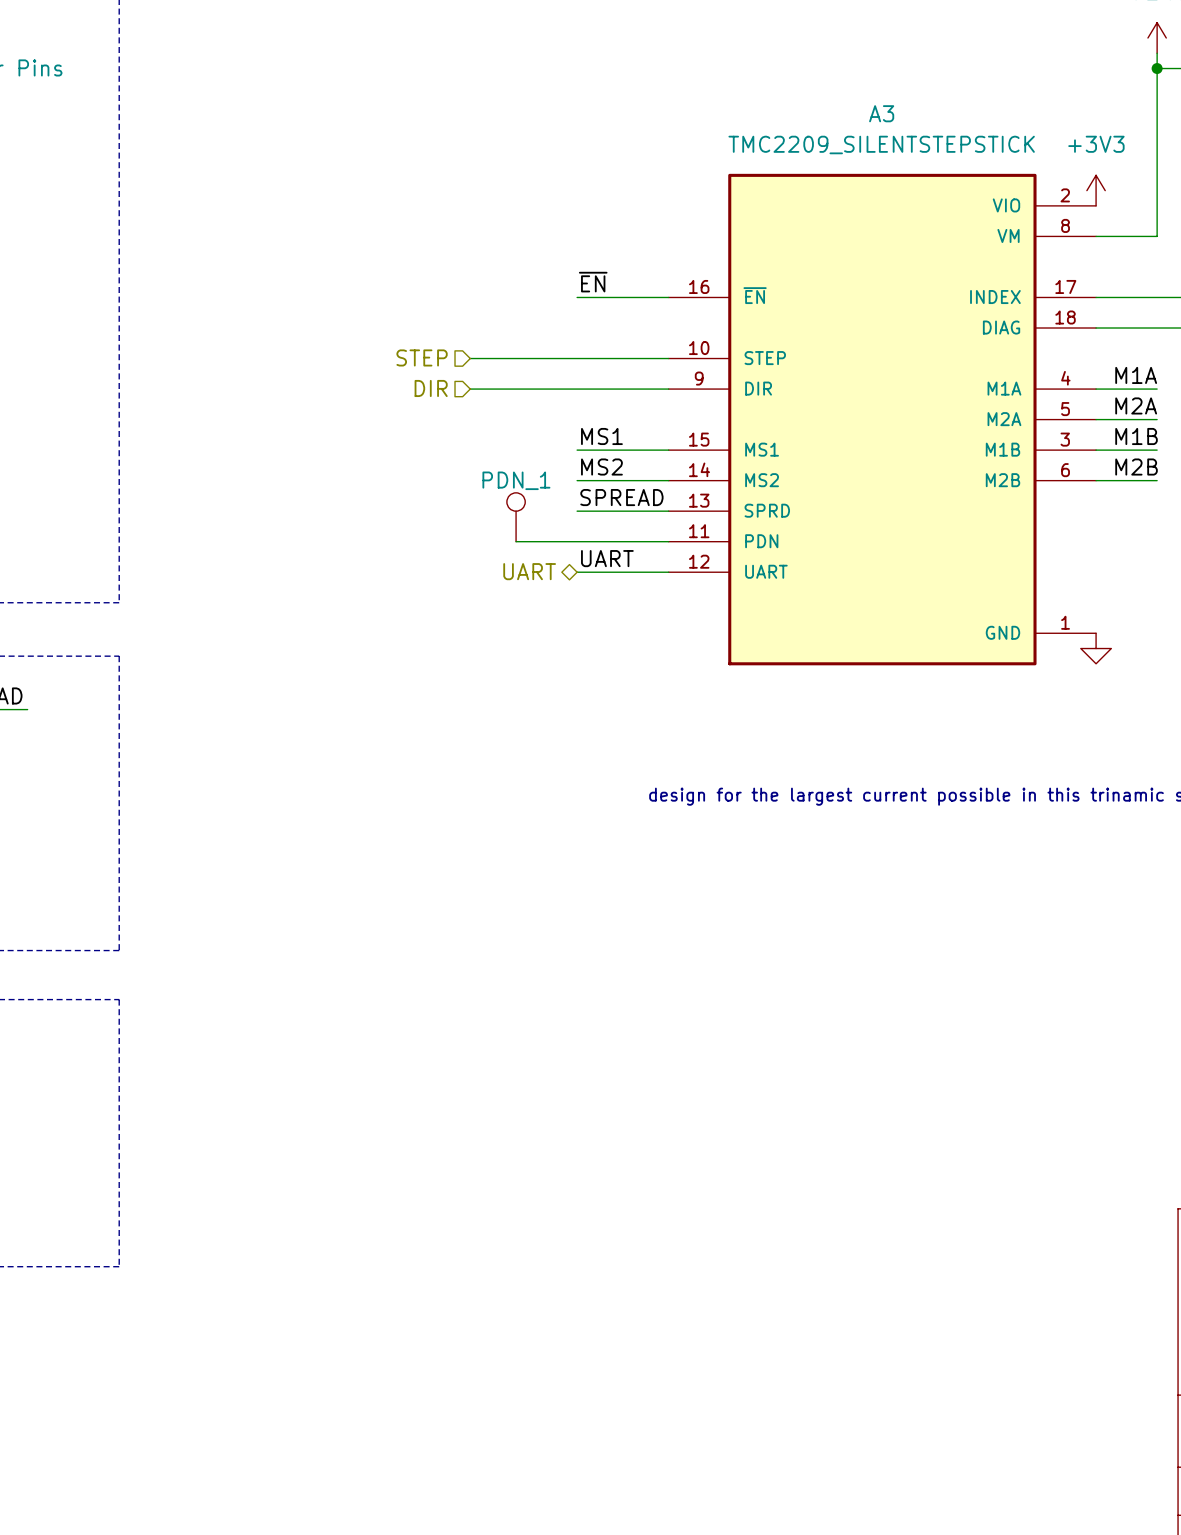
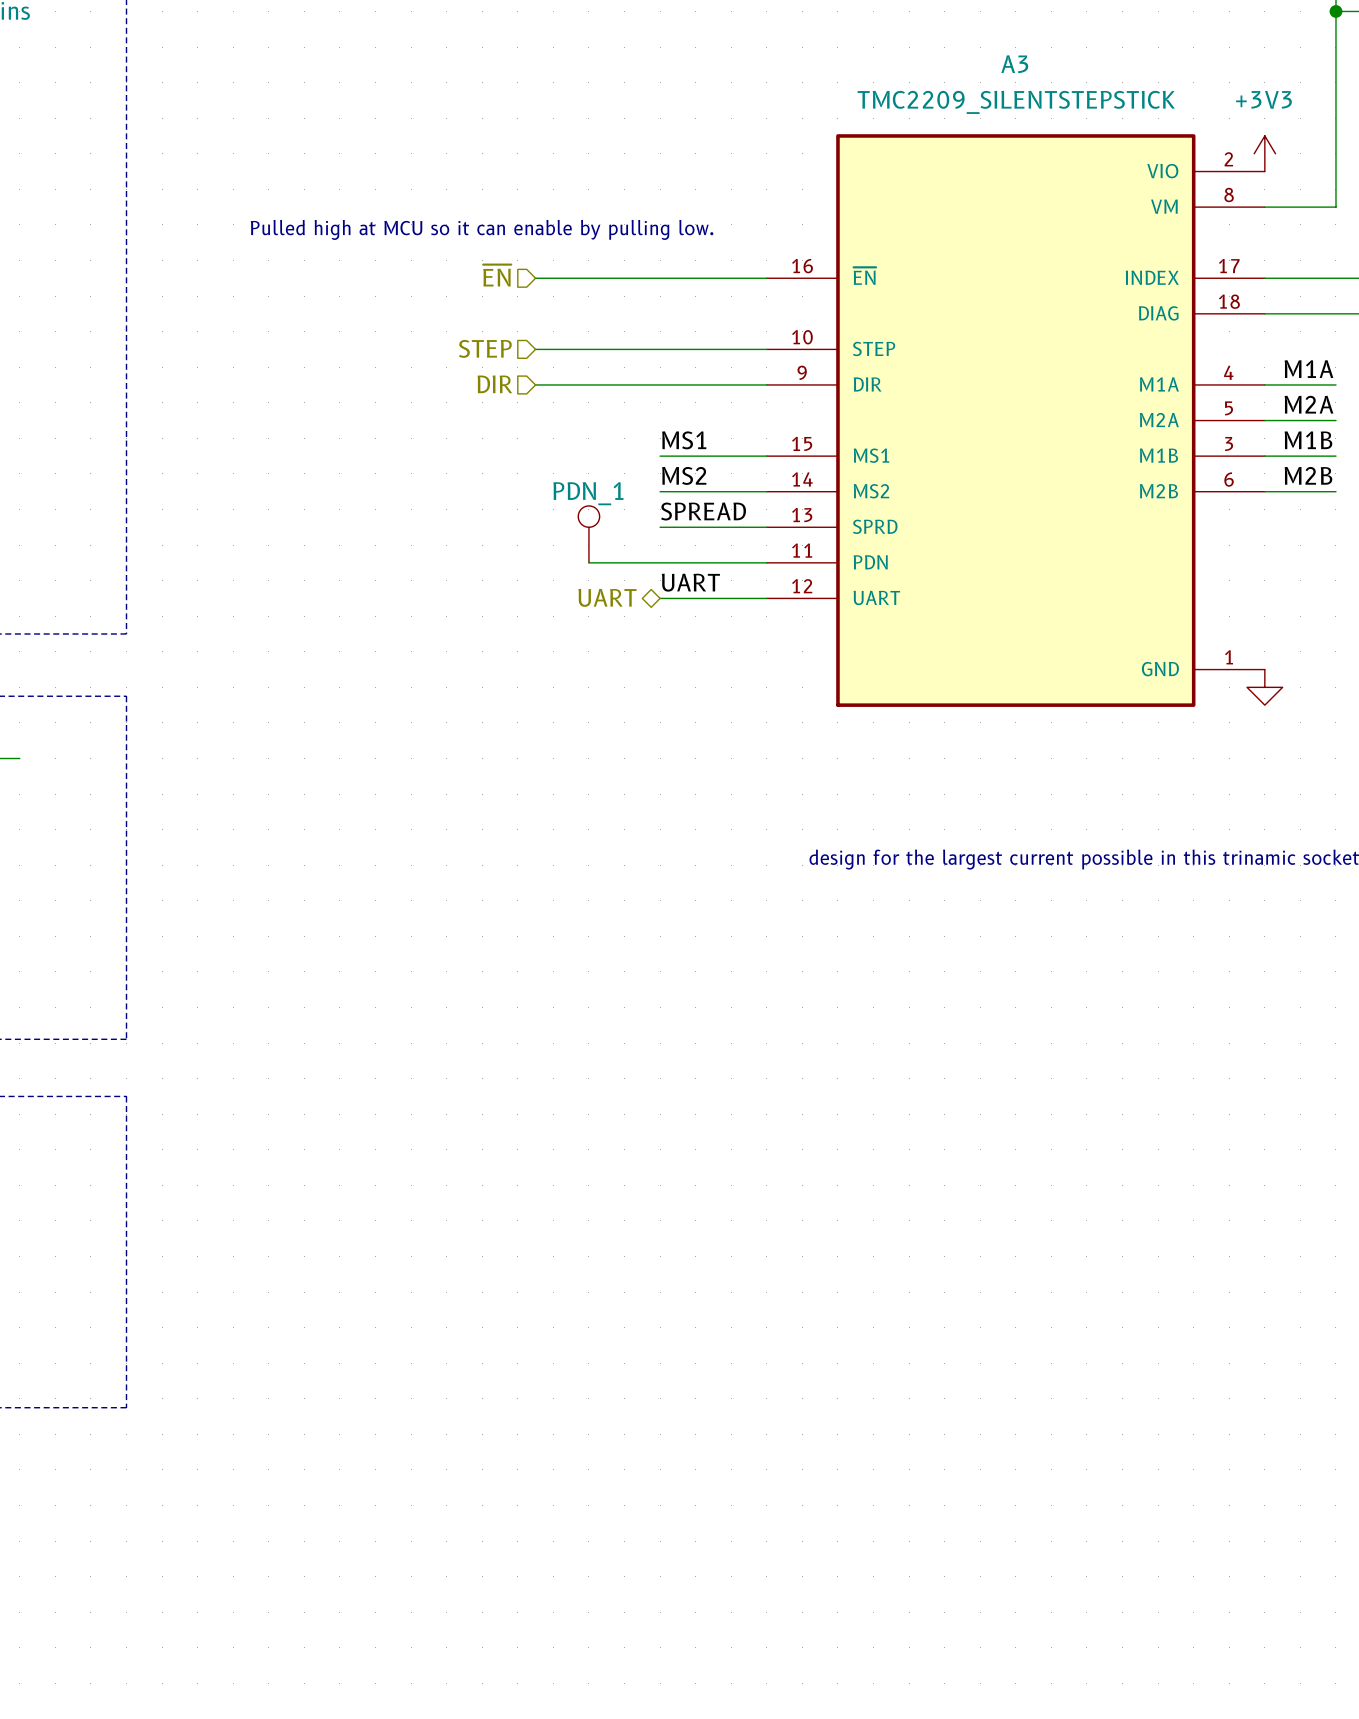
text: none -> Pulled high at MCU so it can enable by pulling low. (482, 229)
label: ~{EN} (593, 282) -> none
hierarchical label: none -> ~{EN} (497, 275)
wire: none -> (535, 278) (660, 278)

